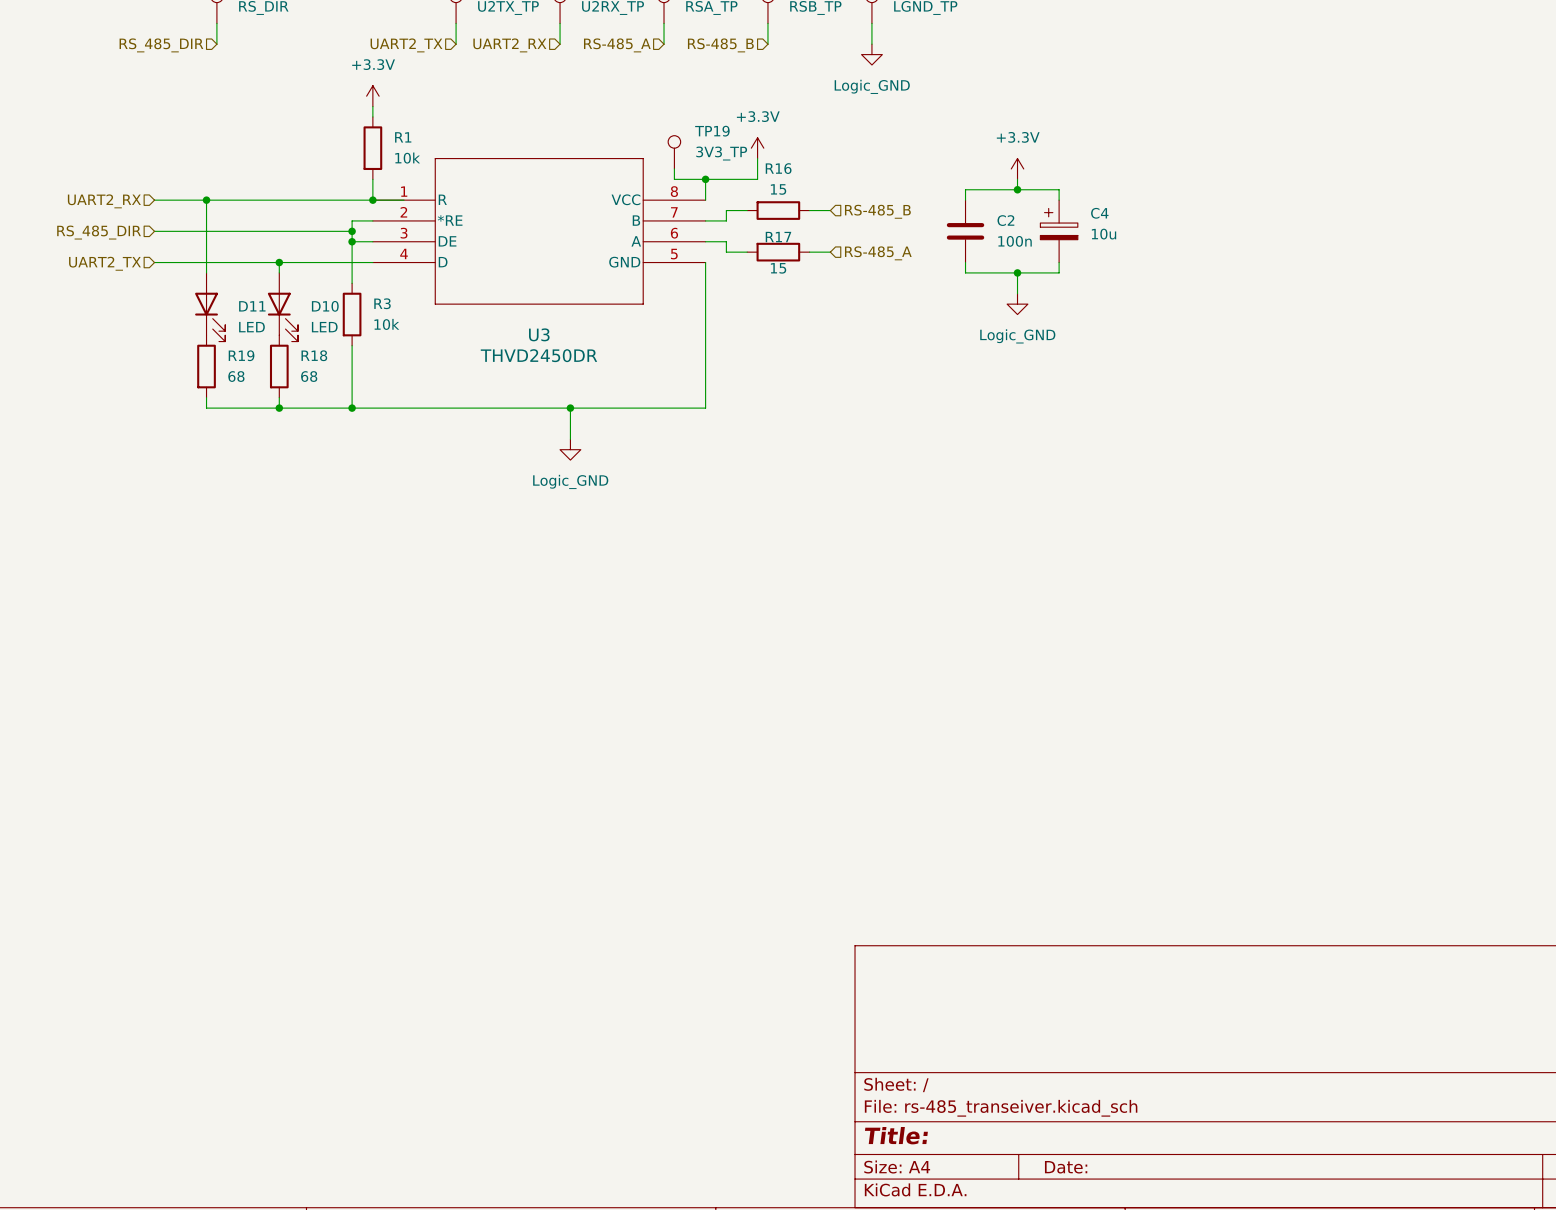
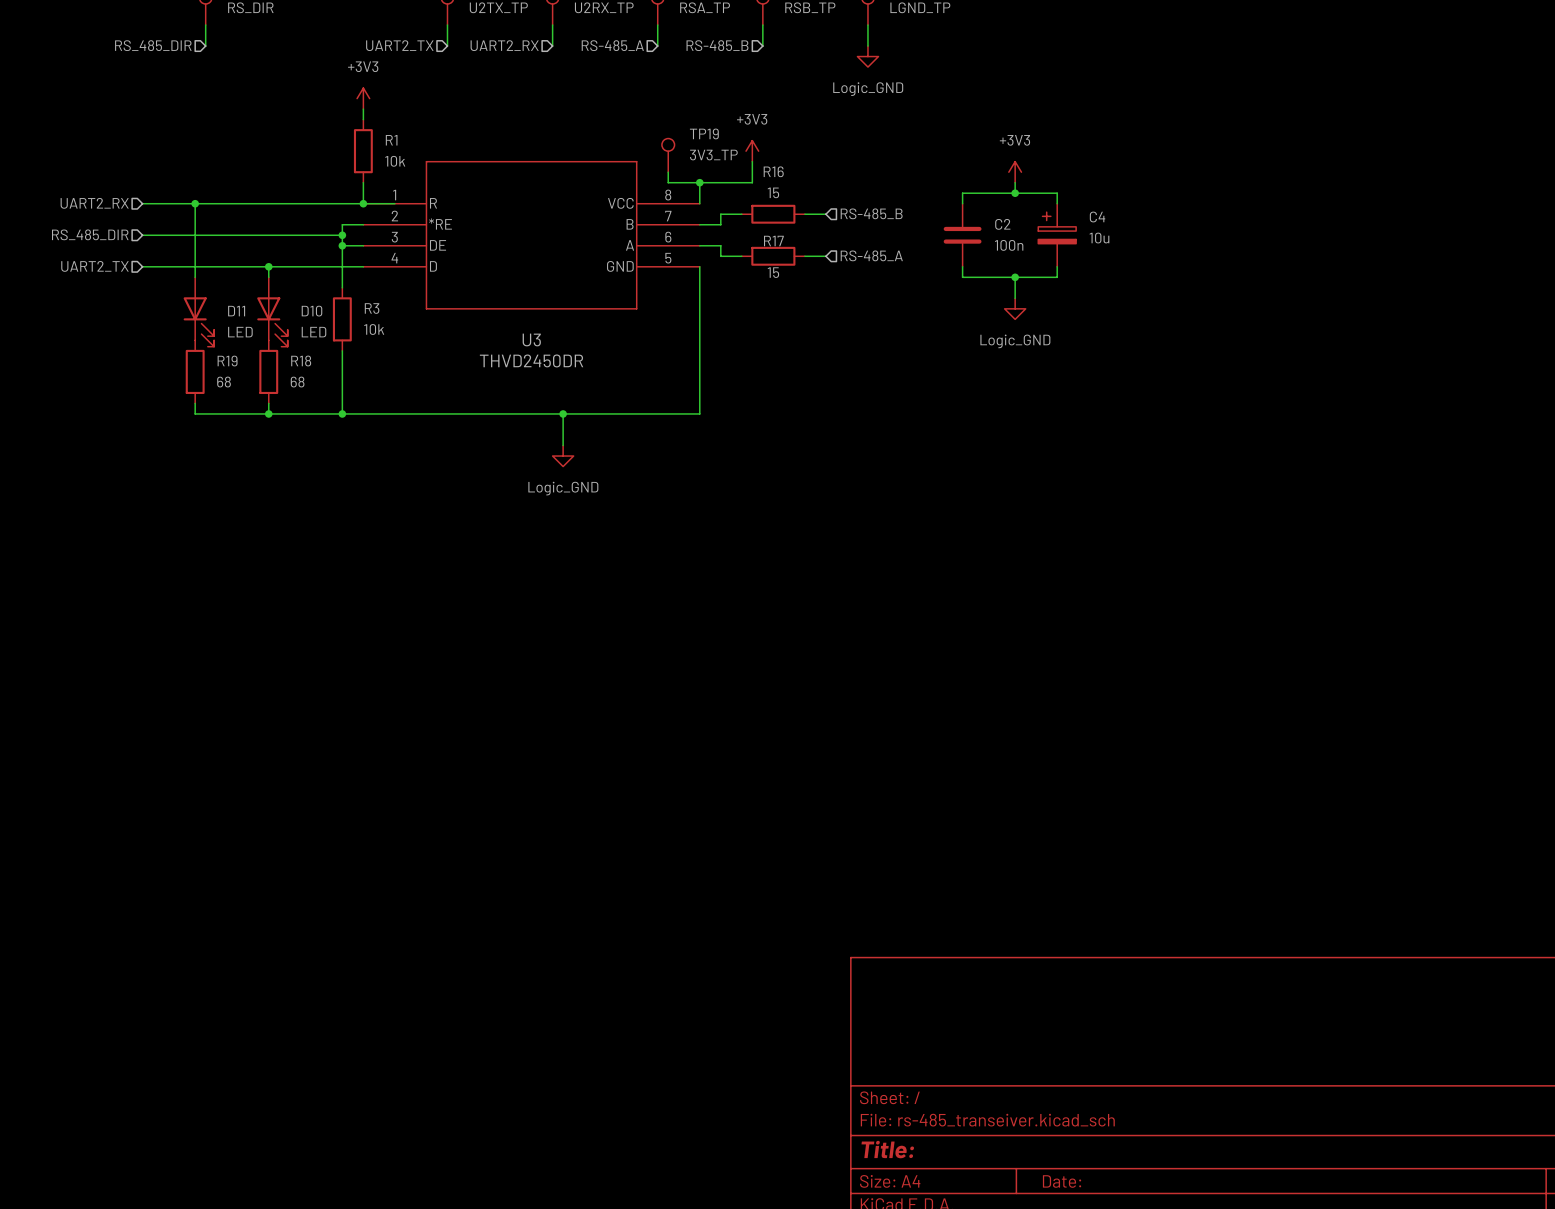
power symbol: +3.3V (372, 96) -> +3V3 (363, 98)
power symbol: +3.3V (757, 148) -> +3V3 (752, 151)
power symbol: +3.3V (1017, 168) -> +3V3 (1015, 172)

